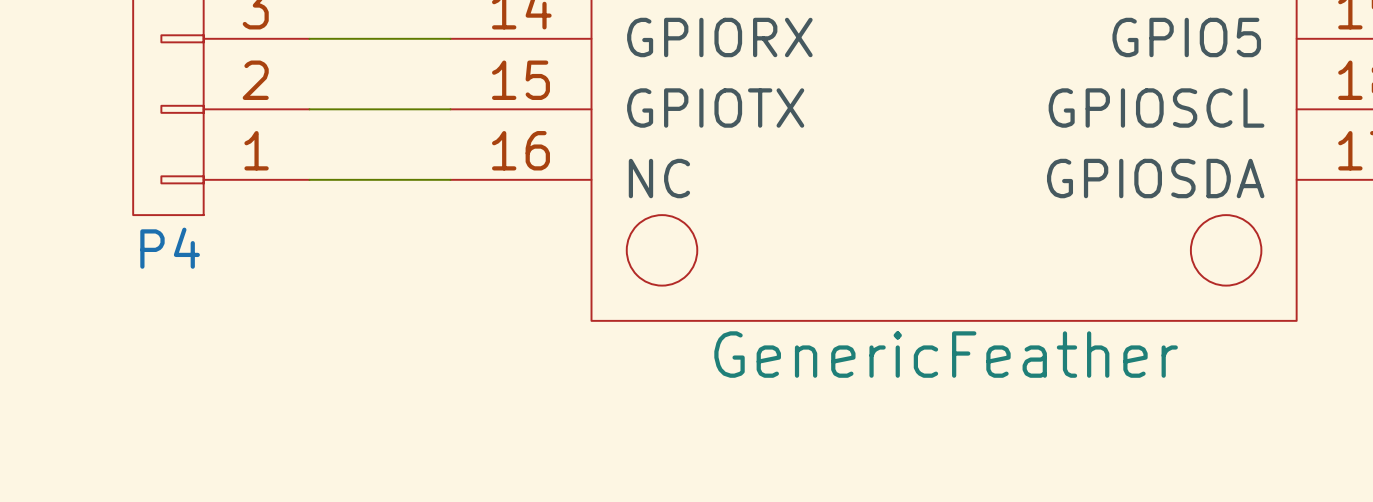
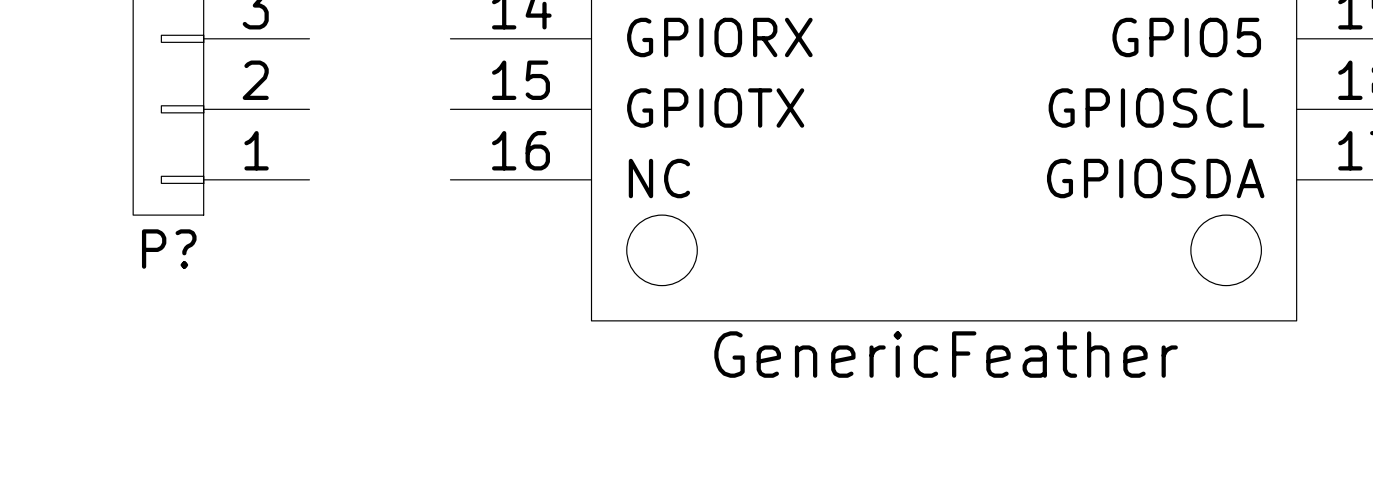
wire: (309, 38) (450, 38) -> none
wire: (309, 109) (450, 109) -> none
wire: (309, 179) (450, 179) -> none
P4 name: P4 (170, 248) -> P? (169, 249)

